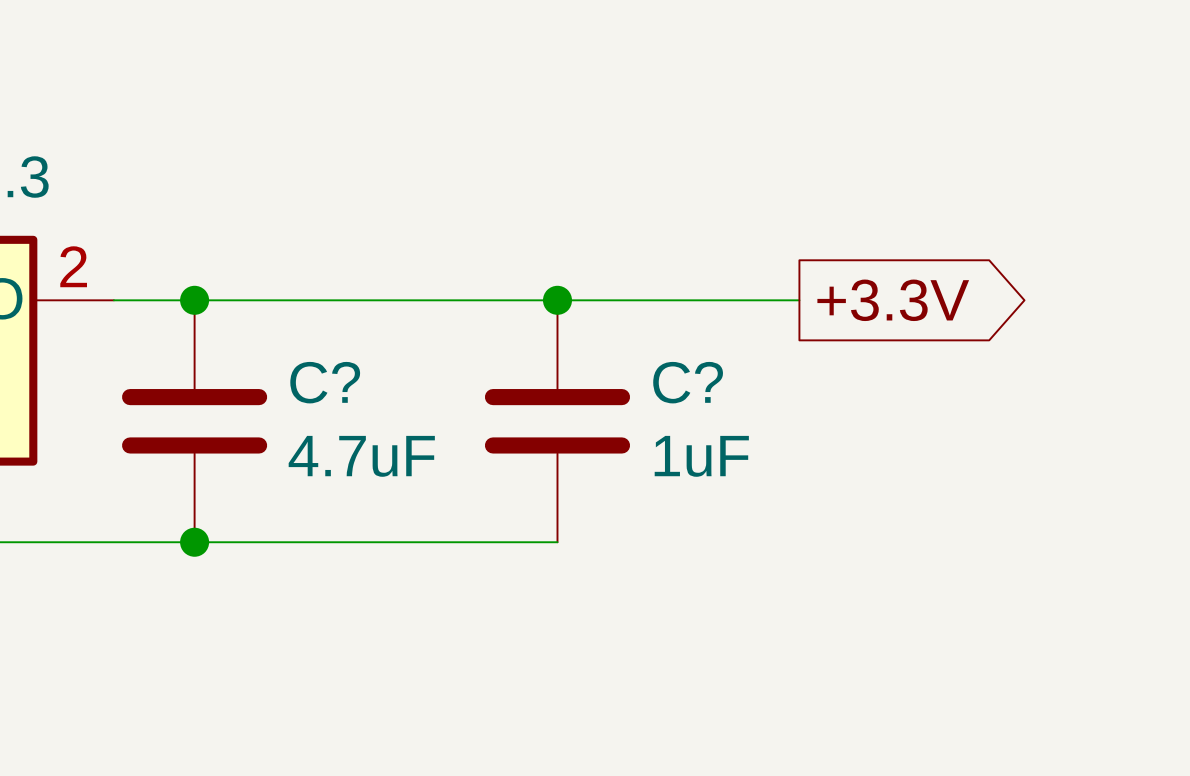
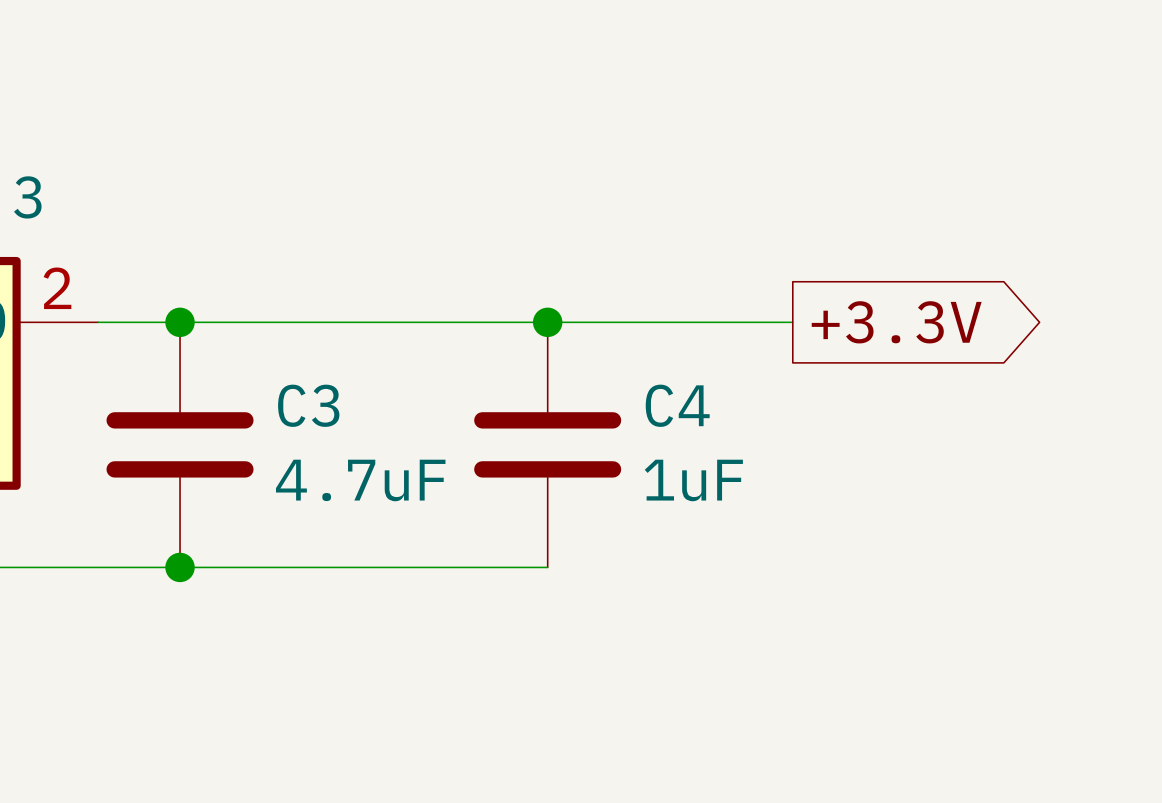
C? name: C? (325, 382) -> C3 (308, 405)
C? name: C? (688, 382) -> C4 (677, 405)

